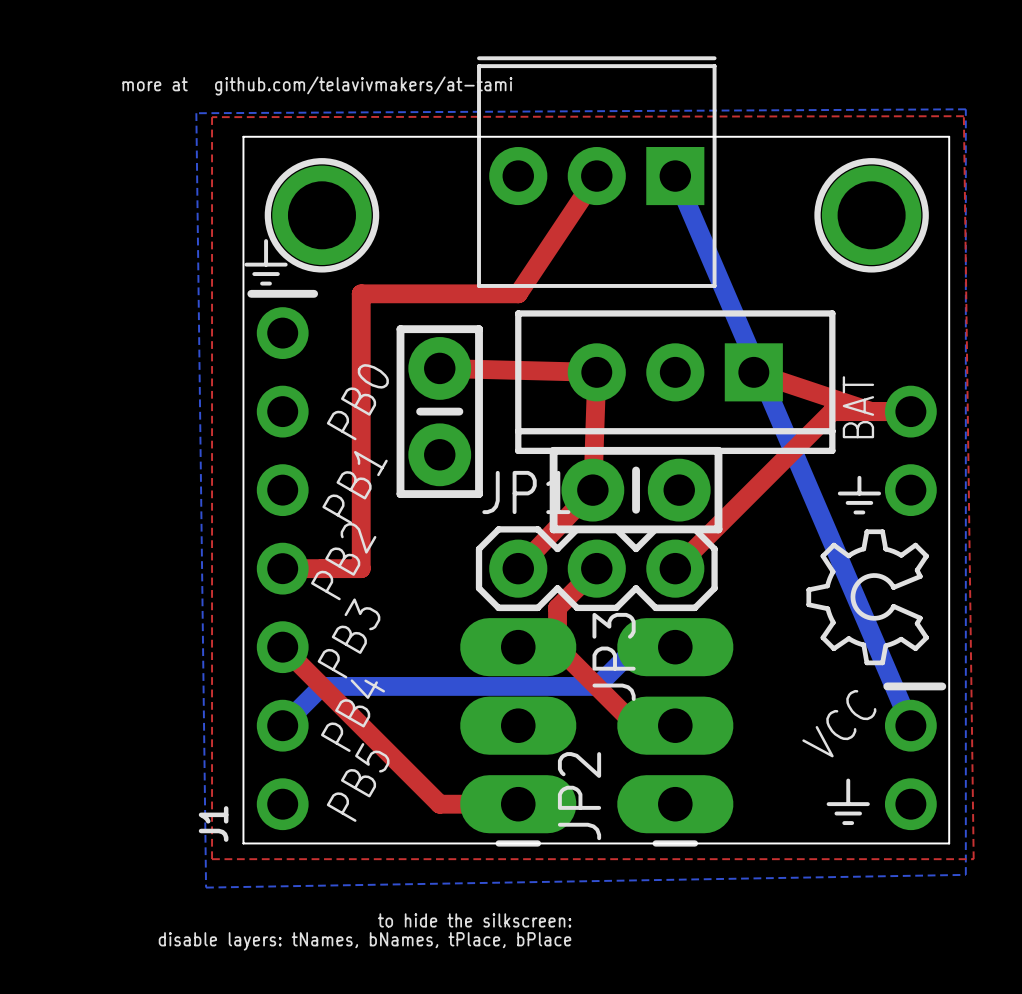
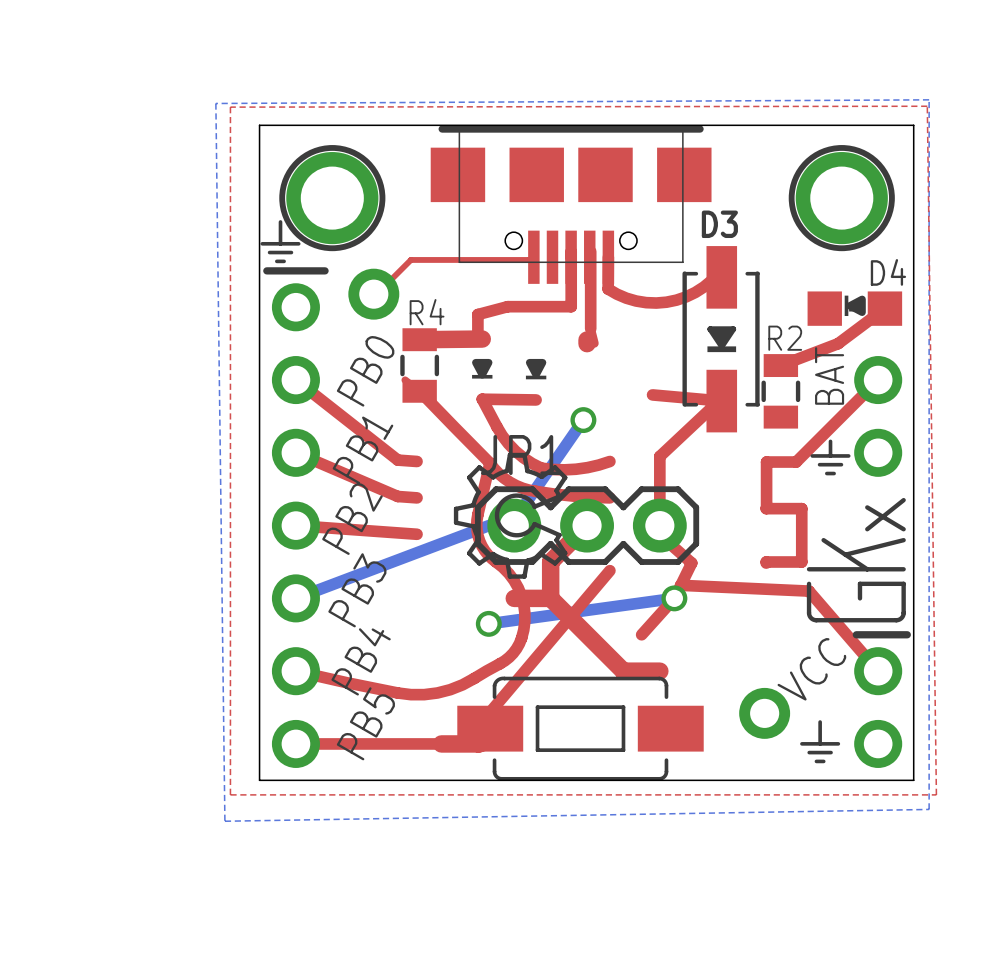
text: more at github.com/telavivmakers/at-tami (317, 85) -> none
part: (596, 172) -> none
top track: (596, 176) (518, 293) (361, 293) (361, 568) (282, 568) -> (417, 534) (295, 525)
bottom track: (675, 176) (910, 725) -> none
part: none -> (571, 204)
top track: none -> (533, 257) (529, 259) (410, 259) (377, 293) (373, 294)
top track: none -> (571, 257) (571, 251) (571, 306) (507, 306) (477, 314) (477, 334) (482, 339) (419, 339)
top track: none -> (589, 257) (590, 251) (590, 328) (594, 343)
top track: none -> (608, 257) (608, 289) (636, 301) (656, 303) (676, 300) (695, 292) (718, 273) (721, 277)
part: none -> (373, 294)
drawing: none -> [844, 295, 866, 317]
D4: none -> (854, 308)
top track: none -> (884, 308) (838, 343) (780, 365)
D3: none -> (721, 339)
top track: (439, 368) (596, 372) (592, 490) (518, 568) -> none
top track: (753, 372) (871, 411) -> none
part: (675, 382) -> none
drawing: none -> [472, 358, 547, 380]
R4: none -> (419, 365)
top track: none -> (295, 380) (397, 460) (417, 461)
top track: none -> (405, 380) (419, 391) (489, 463)
part: (439, 411) -> none
top track: (910, 411) (832, 411) (675, 568) -> (878, 380) (796, 462) (766, 462) (766, 508)
R2: none -> (780, 391)
top track: none -> (652, 394) (721, 401) (718, 401) (659, 456) (659, 534) (691, 563) (674, 598) (641, 634)
top track: none -> (536, 399) (482, 399) (508, 443) (523, 457) (541, 468) (575, 469) (609, 461)
bottom track: none -> (583, 420) (517, 514) (295, 598)
via: none -> (583, 420)
top track: none -> (295, 452) (397, 496) (417, 497)
part: (636, 490) -> none
top track: none -> (489, 463) (477, 514) (477, 530) (484, 550) (508, 573) (521, 595) (524, 612) (523, 630) (519, 643) (513, 653) (504, 660) (462, 684) (437, 692) (424, 694) (397, 693) (295, 671)
top track: none -> (489, 463) (504, 478) (529, 490) (572, 496) (609, 497)
line: none -> (903, 500) (867, 529)
line: none -> (867, 507) (903, 529)
top track: none -> (766, 508) (801, 508) (801, 562) (766, 563) (769, 562)
line: none -> (823, 540) (867, 569)
line: none -> (903, 540) (845, 554)
drawing position: (867, 597) -> (510, 515)
line: none -> (809, 569) (903, 569)
top track: none -> (609, 570) (463, 743)
line: none -> (809, 583) (809, 613) (813, 619) (896, 620) (903, 615) (903, 583) (859, 583) (859, 598)
top track: none -> (680, 585) (809, 591) (878, 671)
top track: (282, 647) (439, 804) -> (295, 743) (441, 743)
bottom track: (675, 647) (636, 647) (596, 686) (321, 686) (282, 725) -> none
bottom track: none -> (674, 598) (488, 623)
via: none -> (674, 598)
via: none -> (488, 623)
JP3: (518, 725) -> none
JP2: (675, 725) -> none
part: none -> (764, 713)
part: none -> (580, 728)
J1 name: J1 (213, 824) -> none
text: to hide the silkscreen: (474, 920) -> none
text: disable layers: tNames, bNames, tPlace, bPlace (365, 941) -> none

